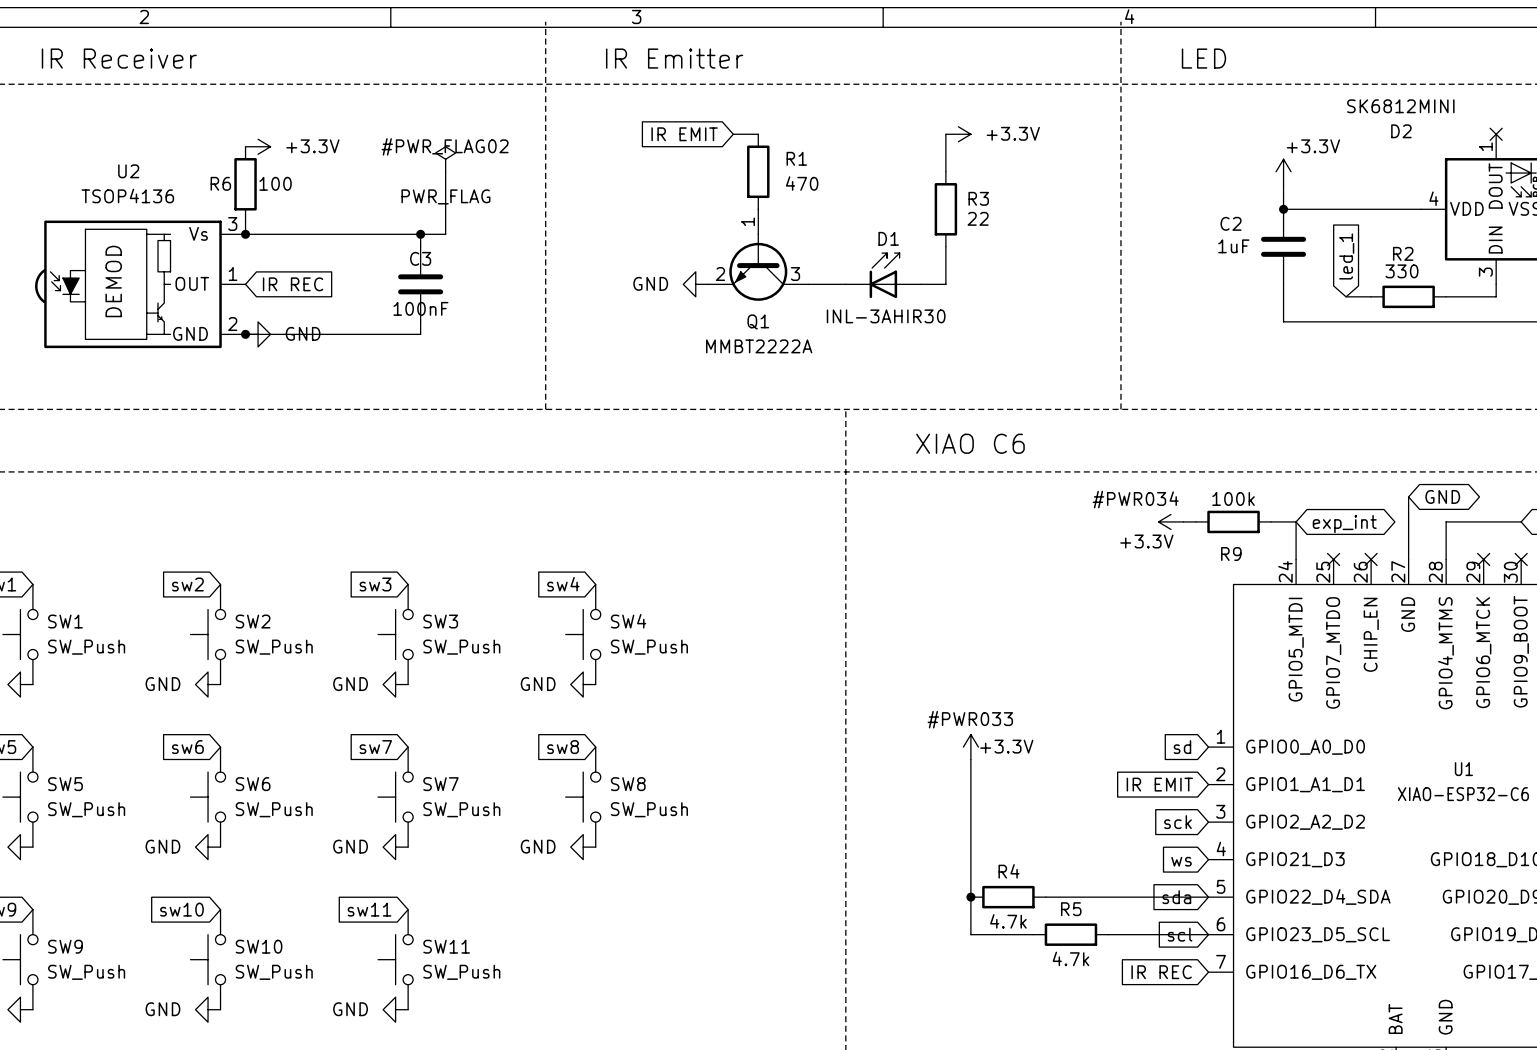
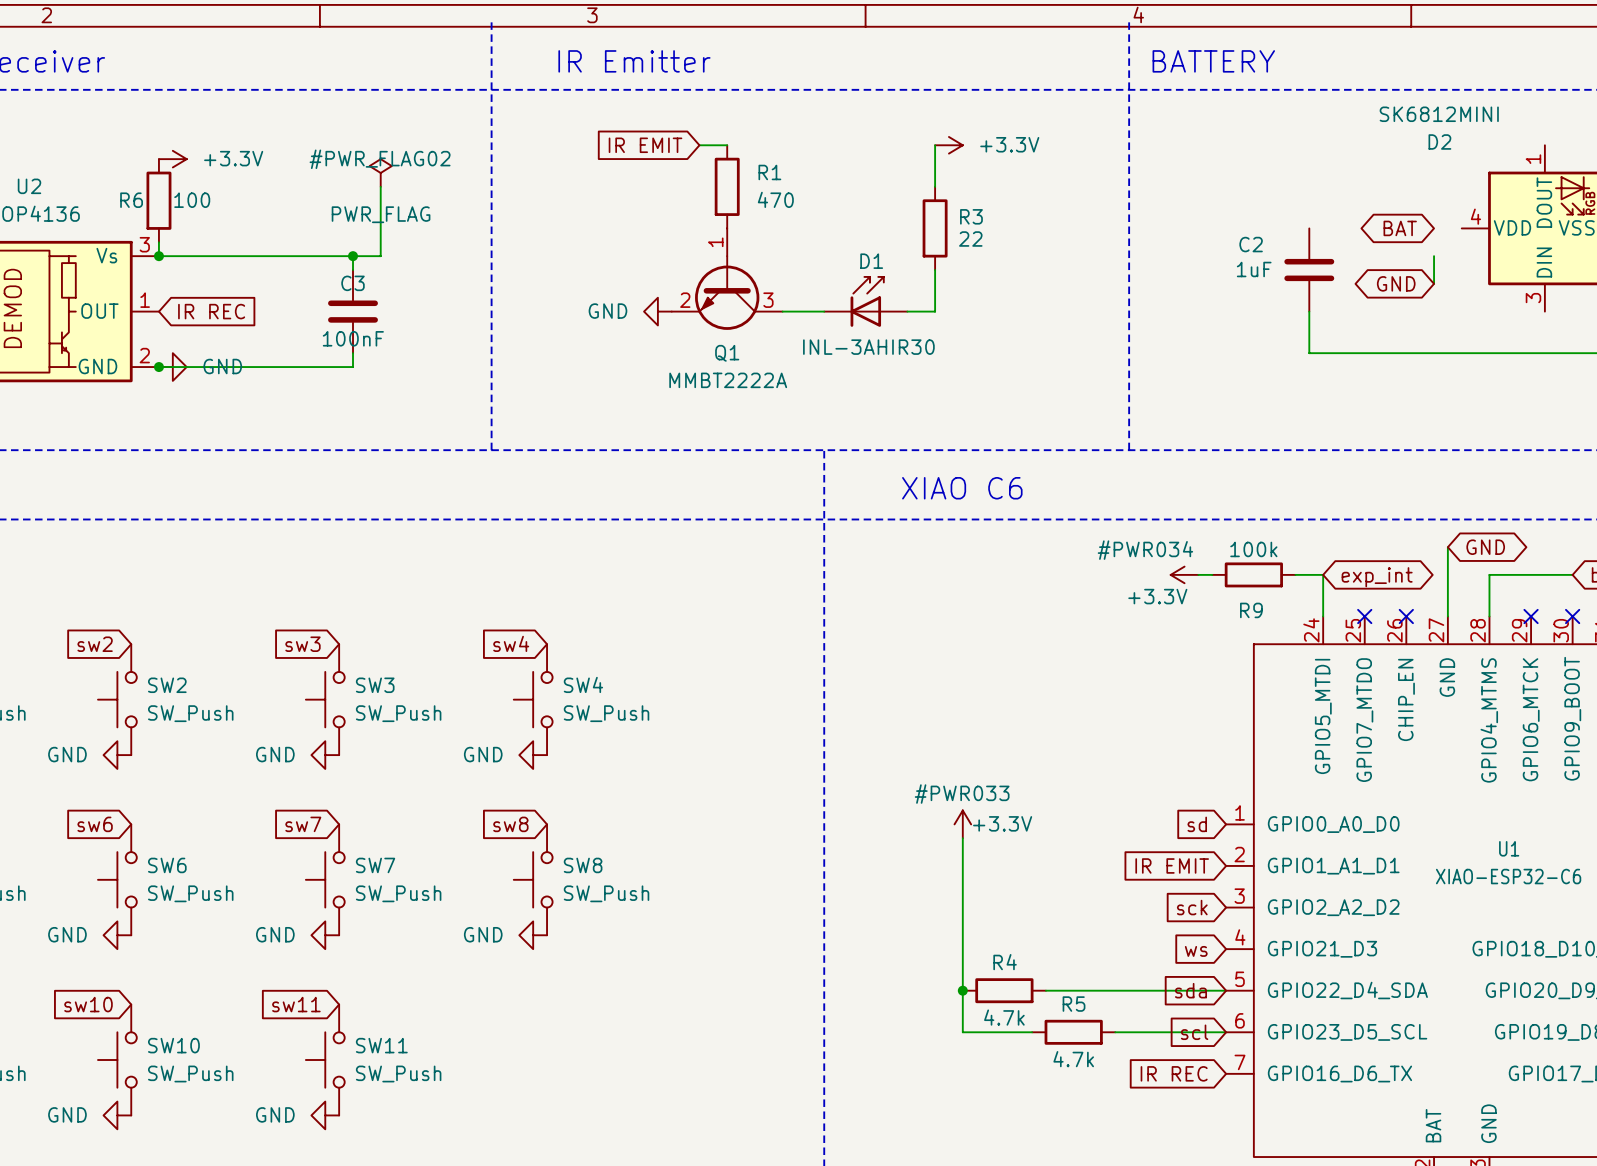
text: LED (1203, 58) -> BATTERY (1213, 61)
no-connect mark: (1496, 134) -> none
power symbol: +3.3V (1283, 171) -> none
wire: (1283, 184) (1283, 209) (1421, 209) -> none
junction: (1283, 209) -> none
global label: none -> BAT (1400, 228)
wire: none -> (1434, 256) (1434, 283)
global label: led_1 (1346, 256) -> none
global label: none -> GND (1396, 283)
wire: (1496, 284) (1496, 296) (1446, 296) -> none
wire: (1346, 296) (1371, 296) -> none
R2: 330 (1408, 296) -> none

